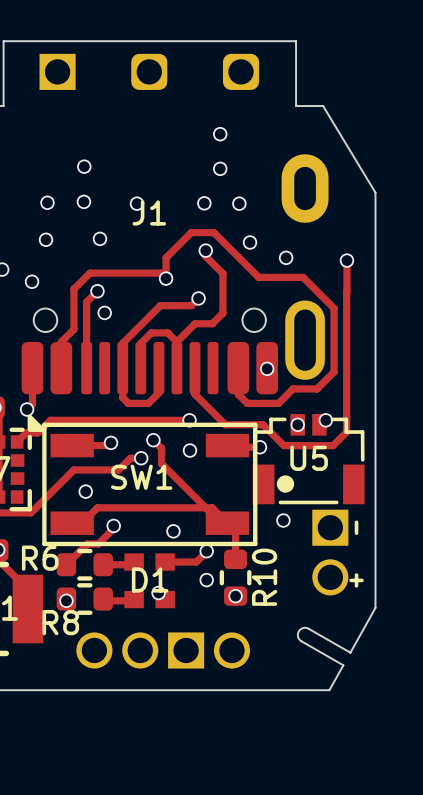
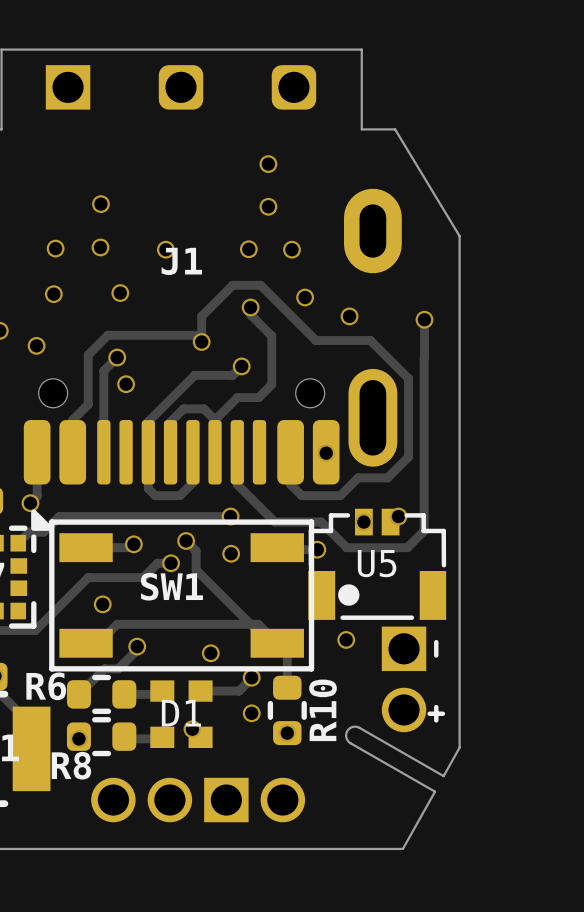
board edge: (362, 631) (350, 652) (307, 628) (302, 628) (298, 631) (298, 636) (300, 640) (343, 665) -> (443, 776) (358, 727) (352, 727) (347, 731) (346, 737) (349, 742) (435, 791) (420, 818)

